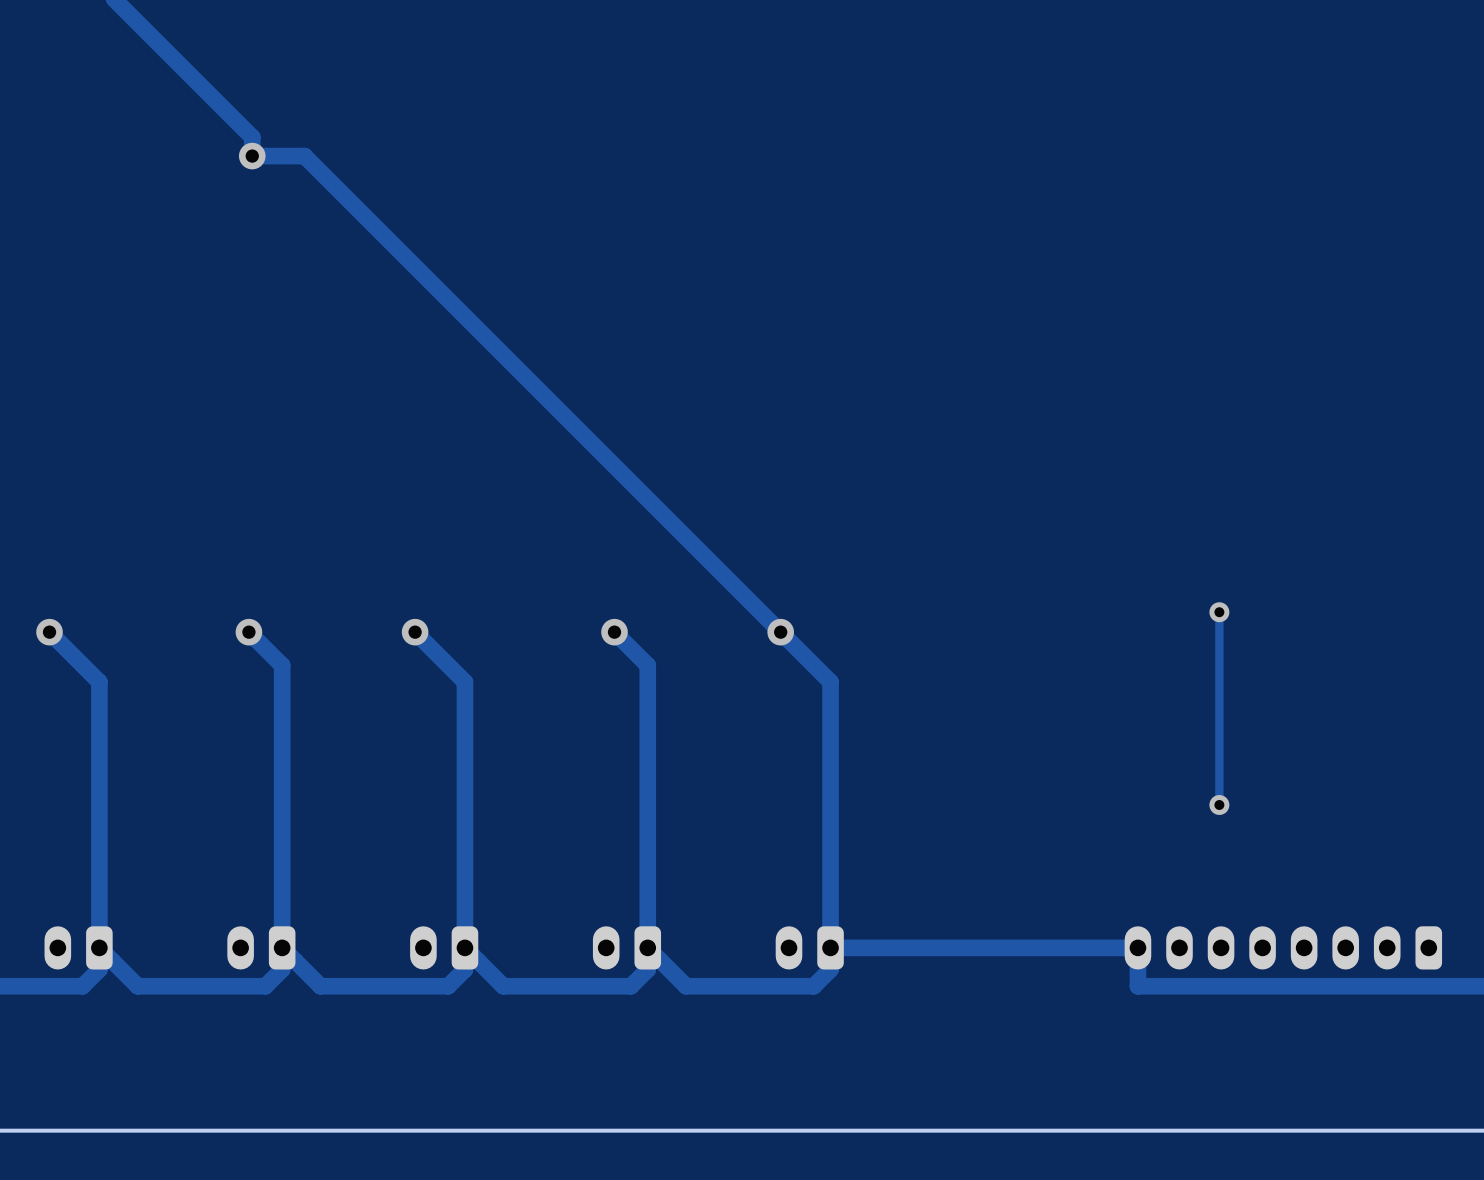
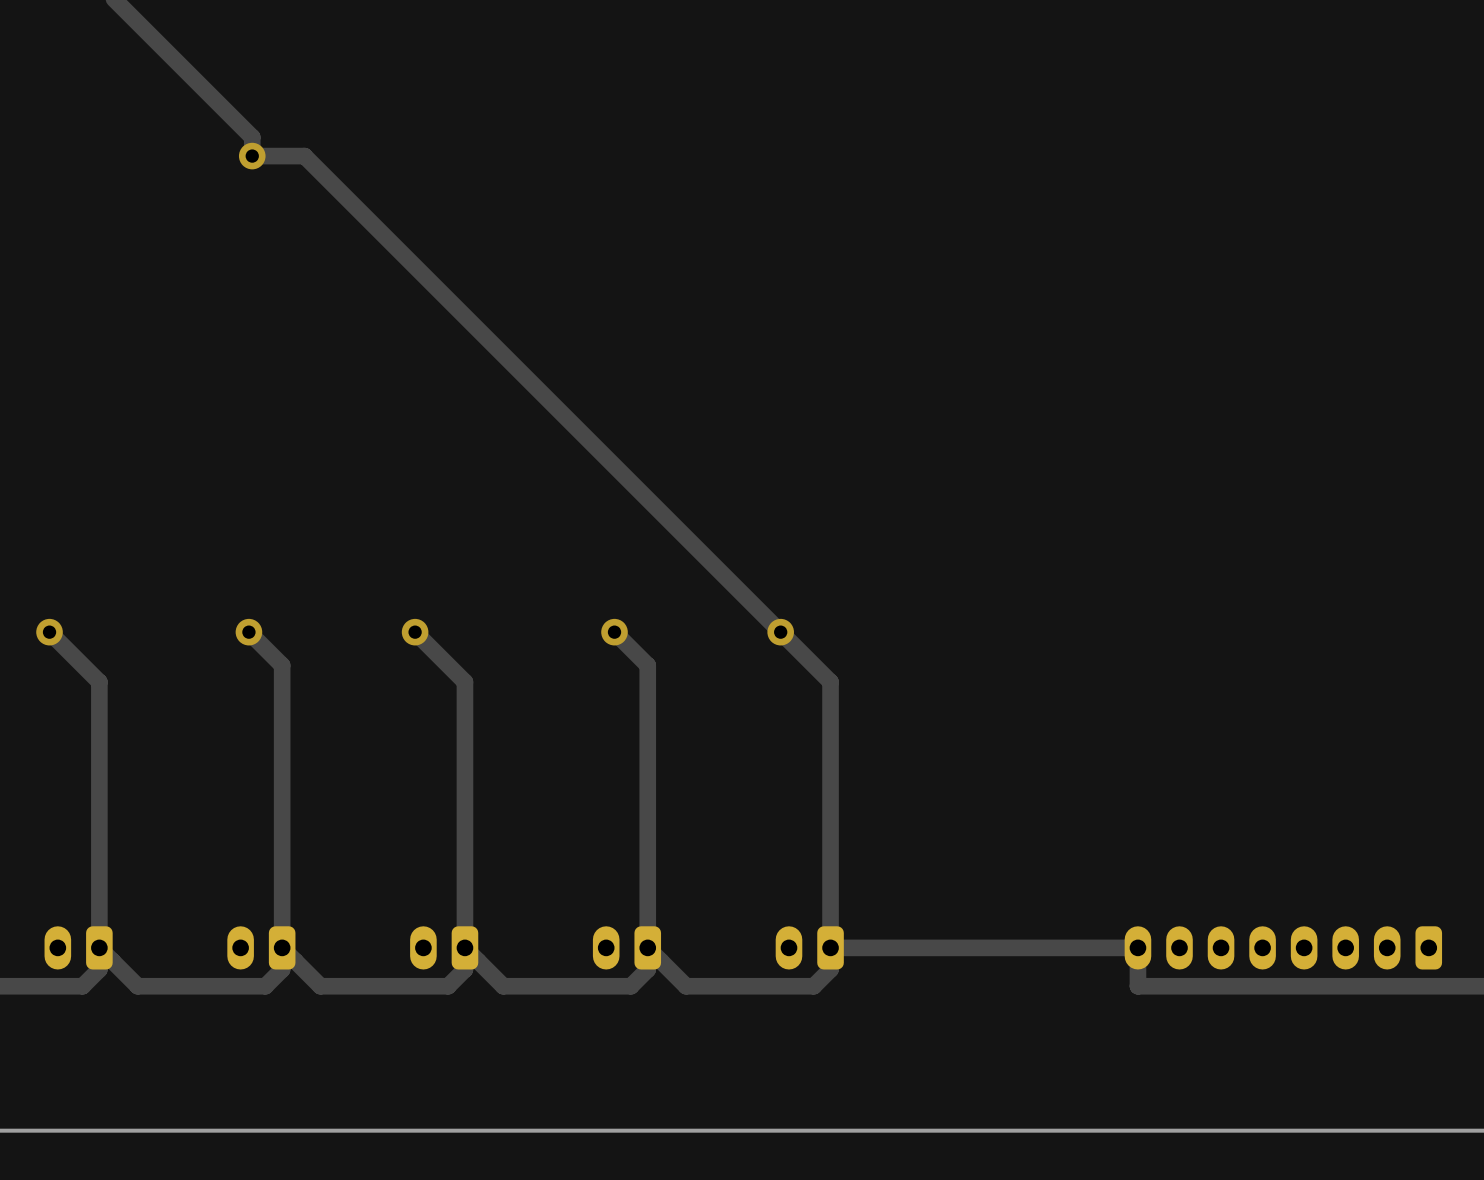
track: (1219, 612) (1219, 804) -> none
via: (1219, 612) -> none
via: (1219, 804) -> none

